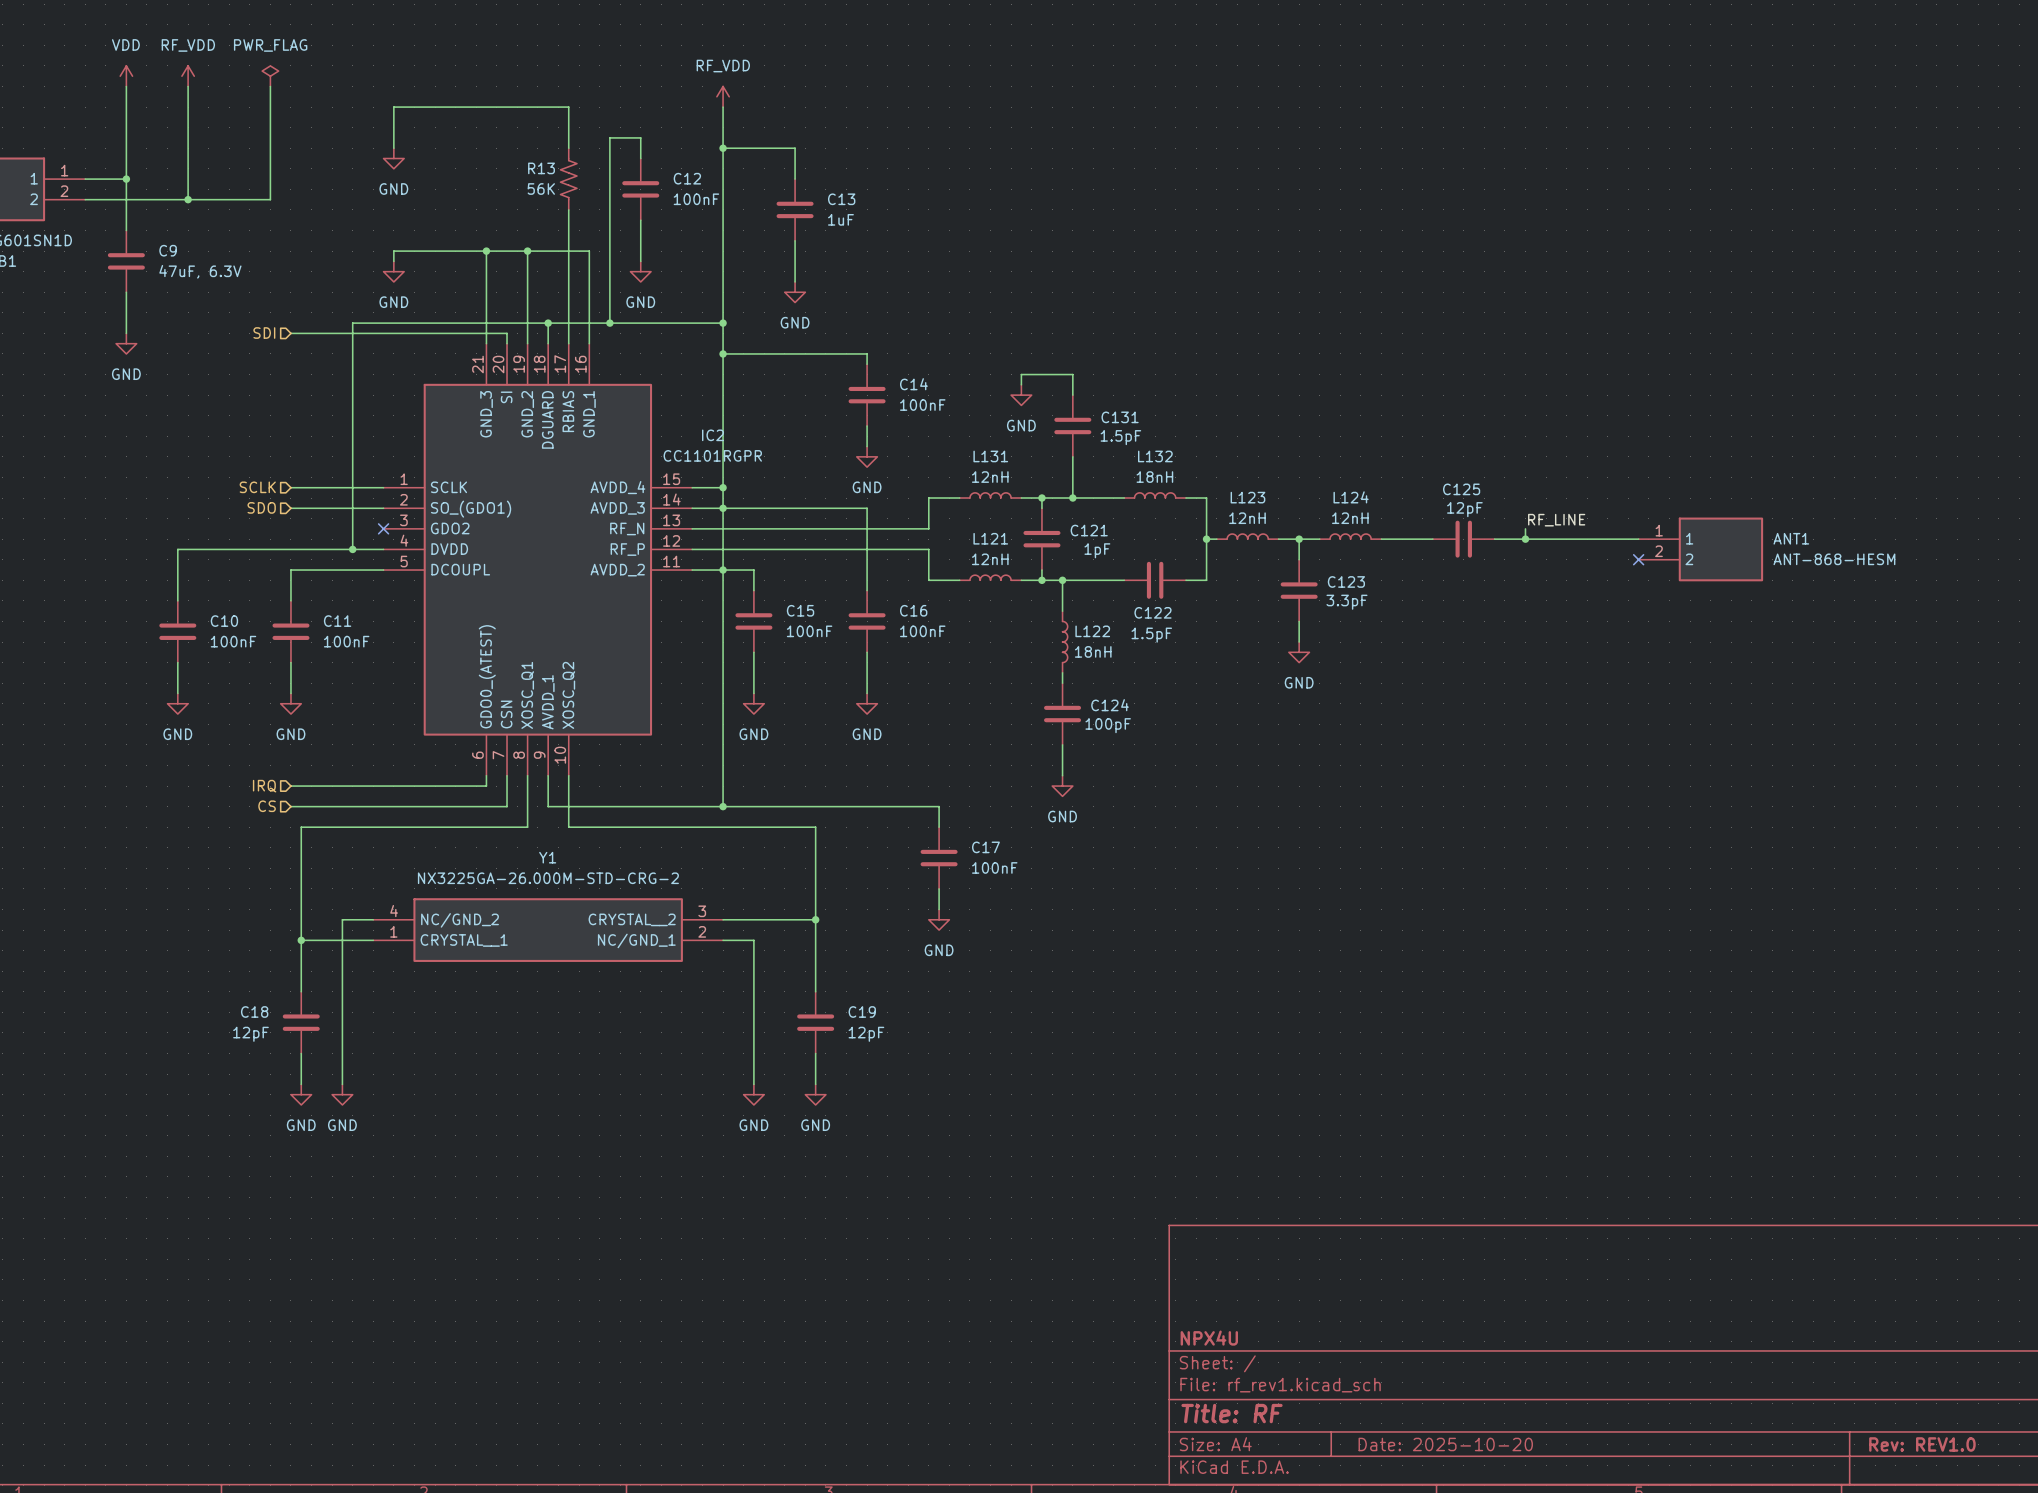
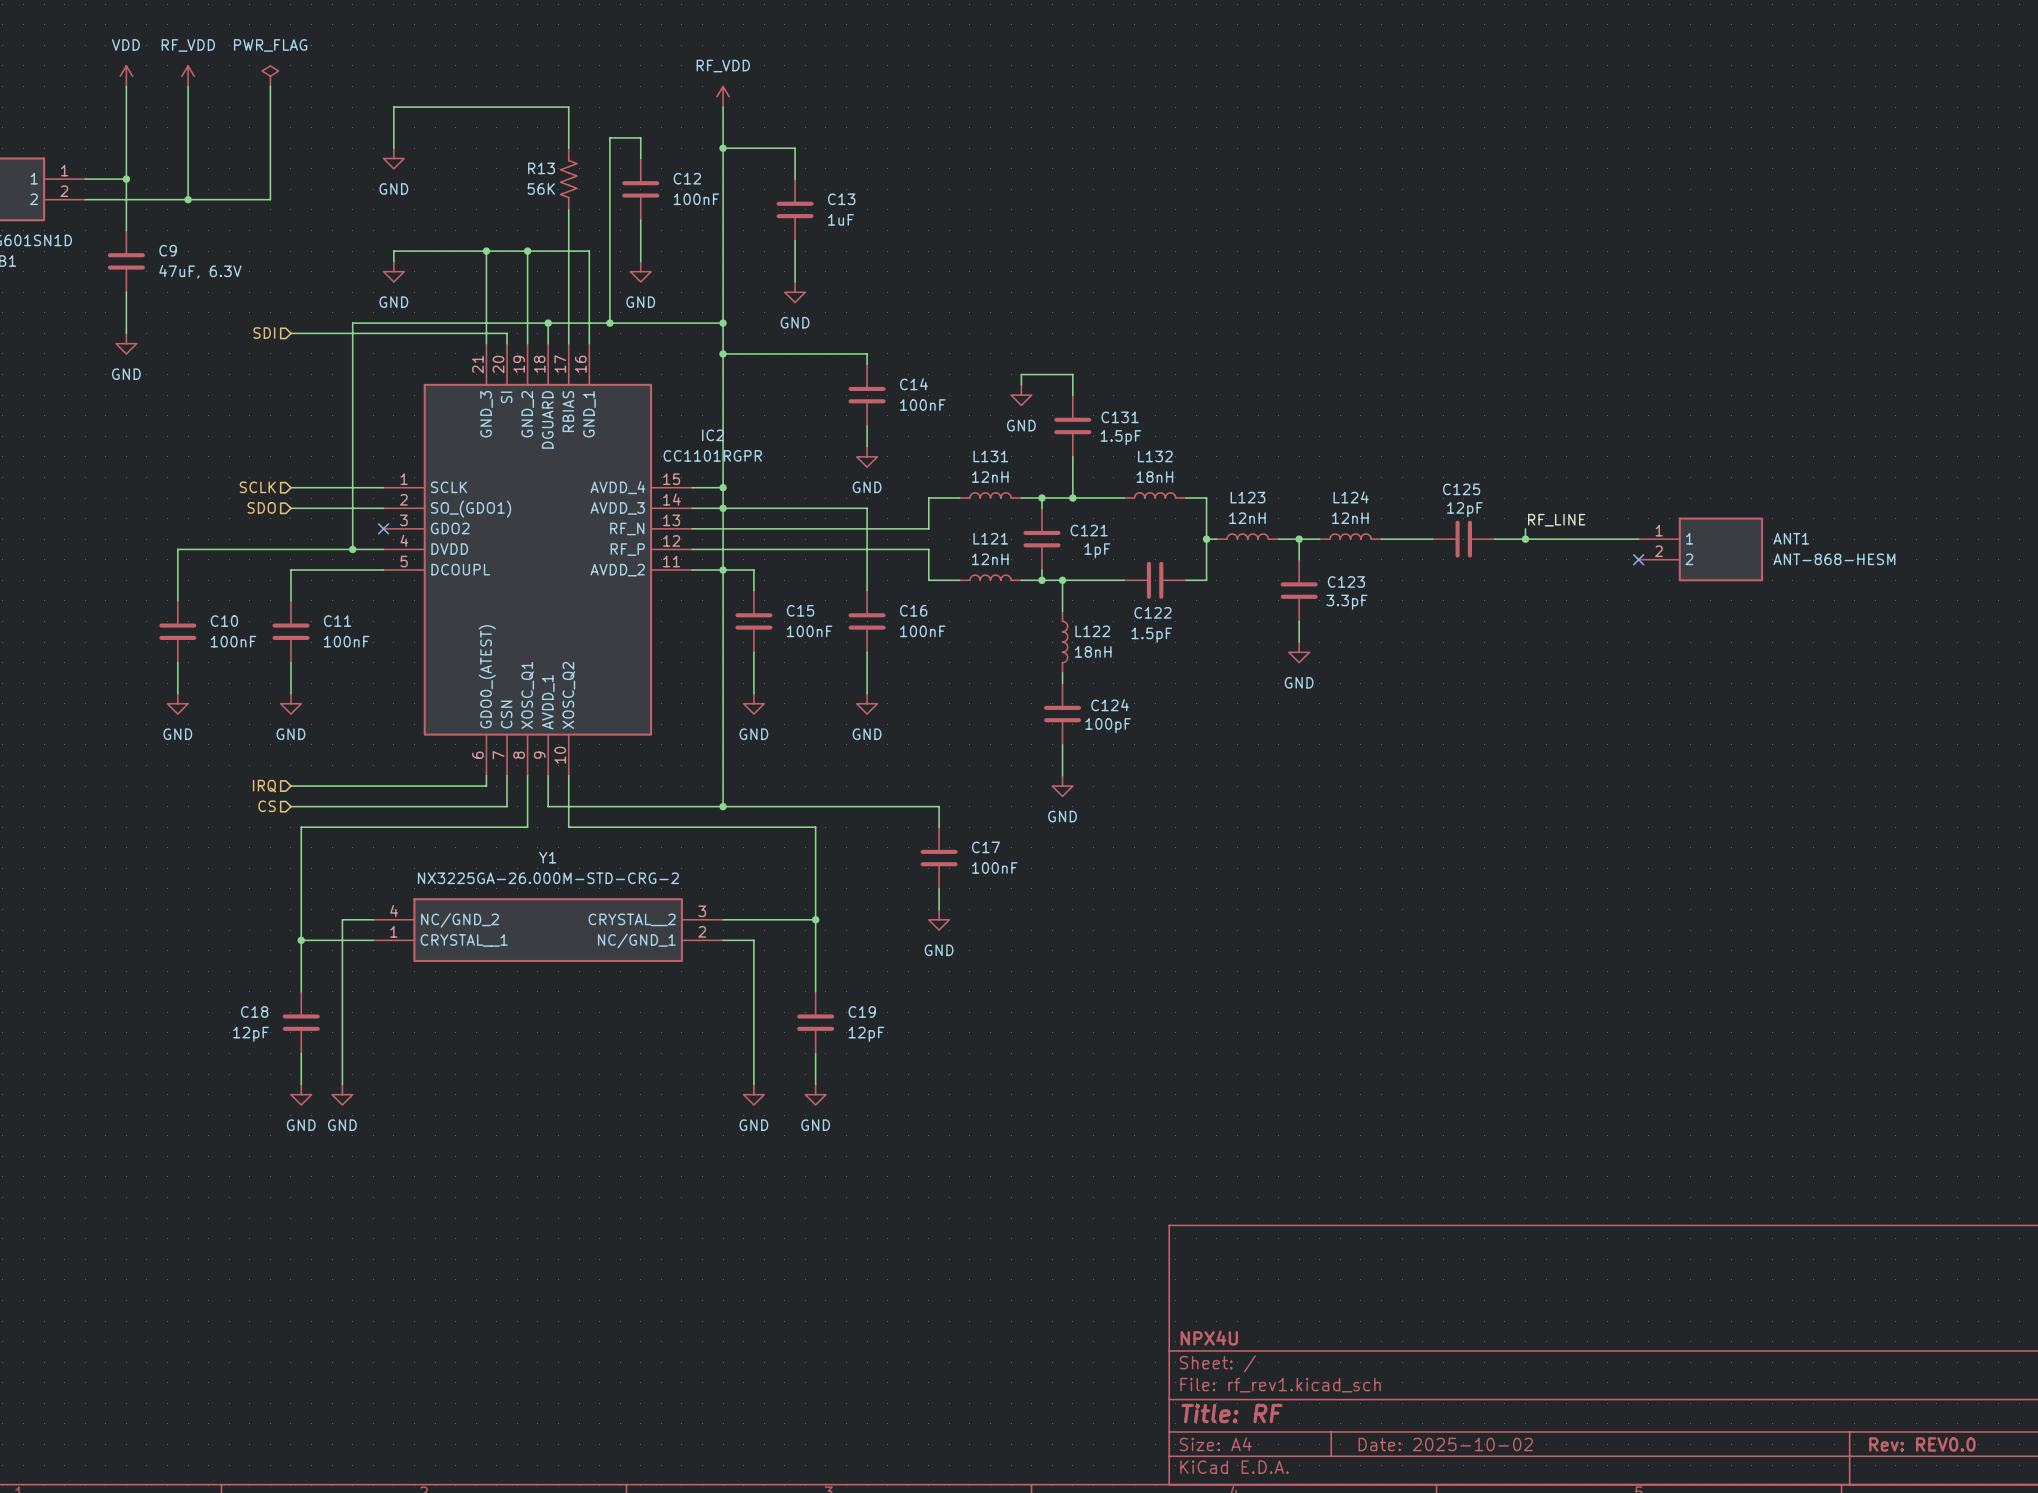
title block: Date: 2025-10-20 (1445, 1444) -> Date: 2025-10-02 (1445, 1444)
title block: Rev: REV1.0 (1922, 1444) -> Rev: REV0.0 (1922, 1444)

